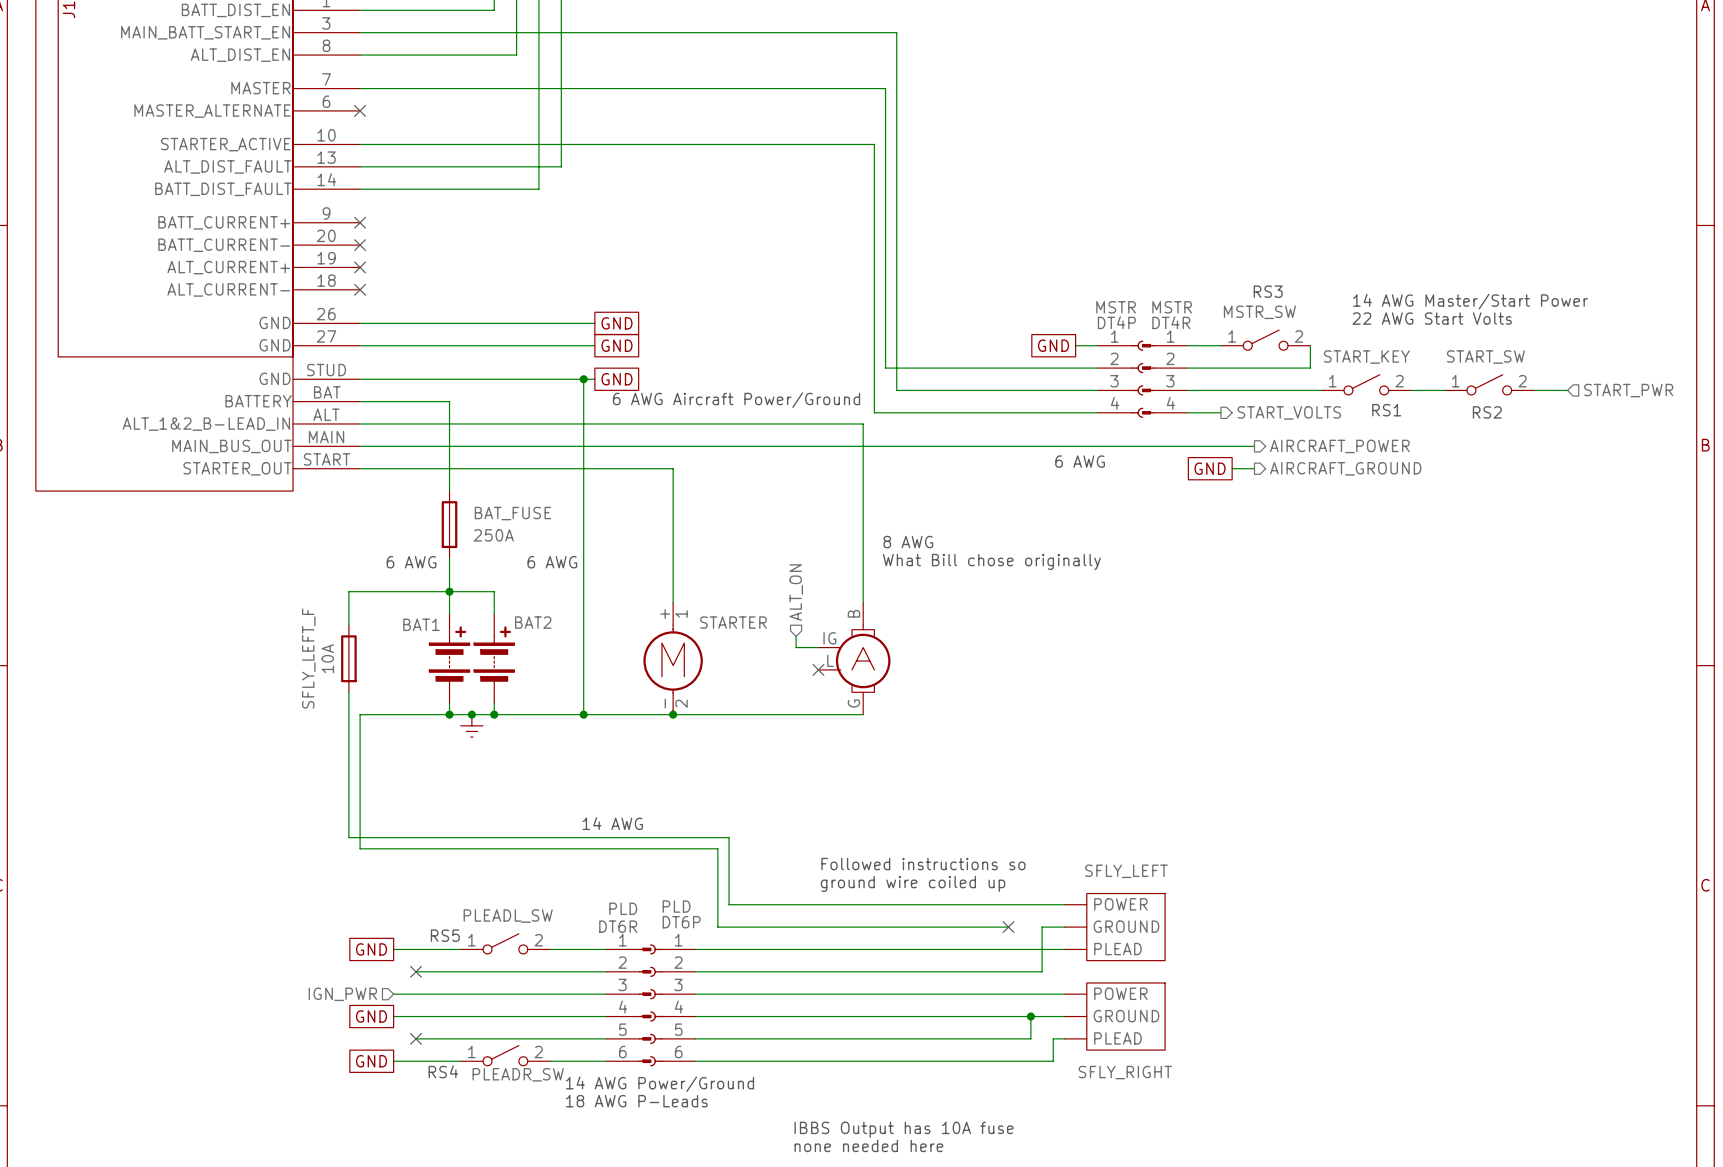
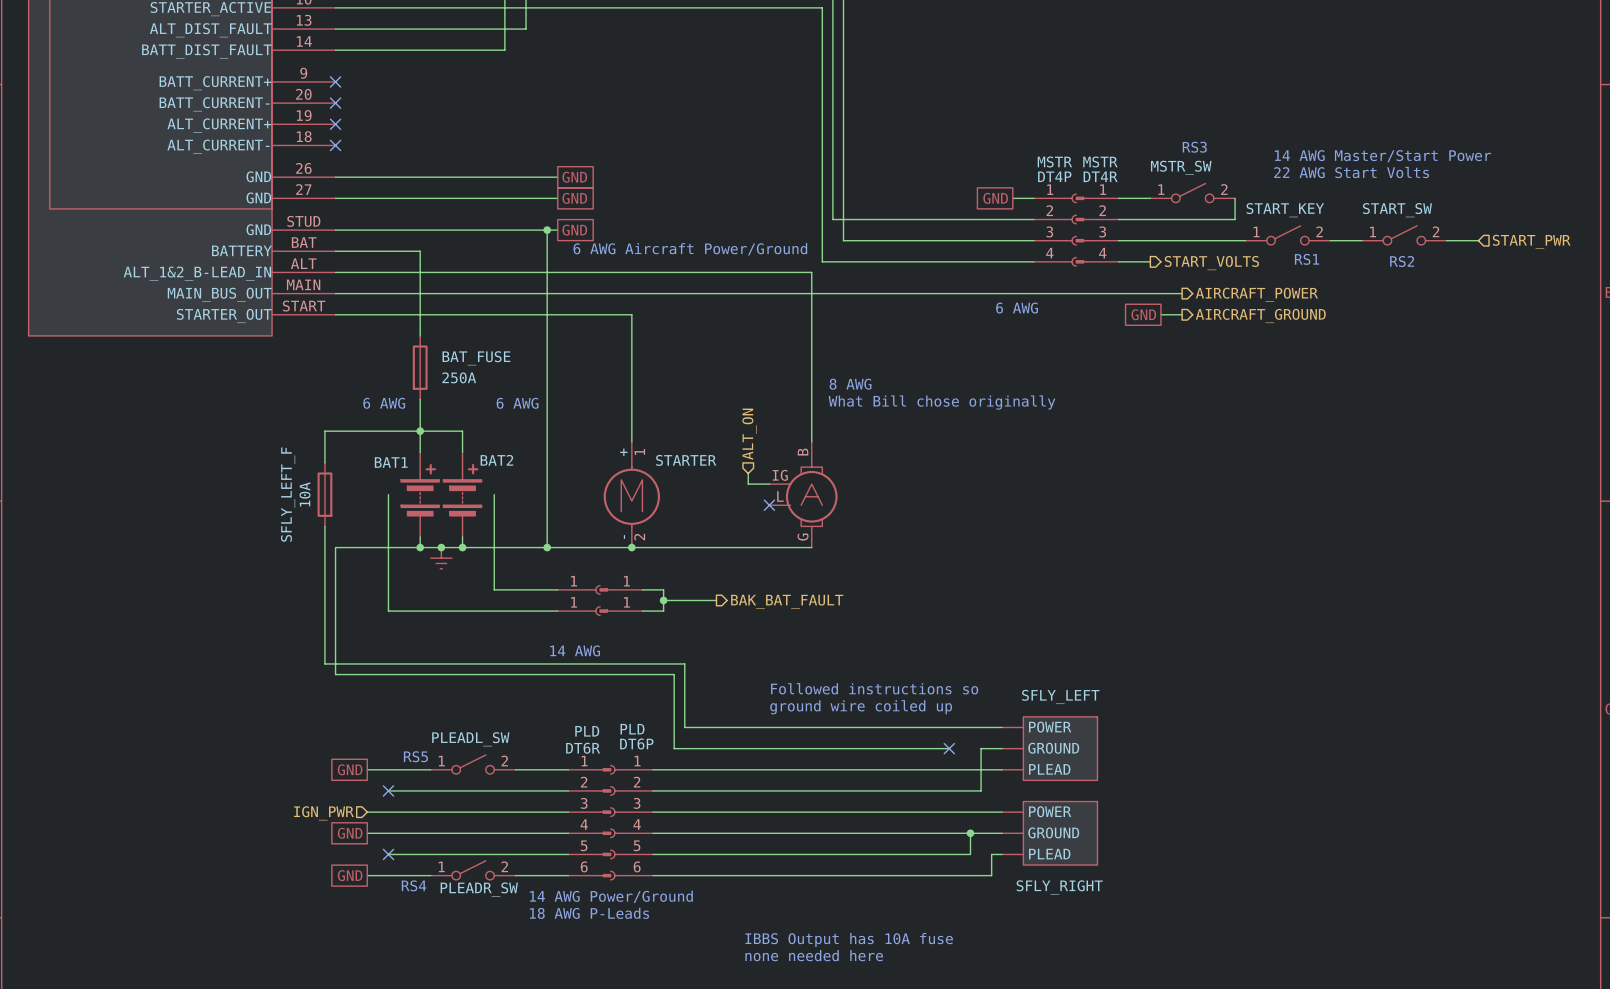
wire: none -> (388, 494) (388, 611) (557, 611)
wire: none -> (494, 494) (494, 589) (557, 589)
part: none -> (579, 589)
part: none -> (620, 589)
wire: none -> (642, 589) (663, 589) (663, 611) (642, 611)
wire: none -> (663, 600) (716, 600)
junction: none -> (663, 600)
hierarchical label: none -> BAK_BAT_FAULT (787, 601)
part: none -> (579, 611)
part: none -> (620, 611)

